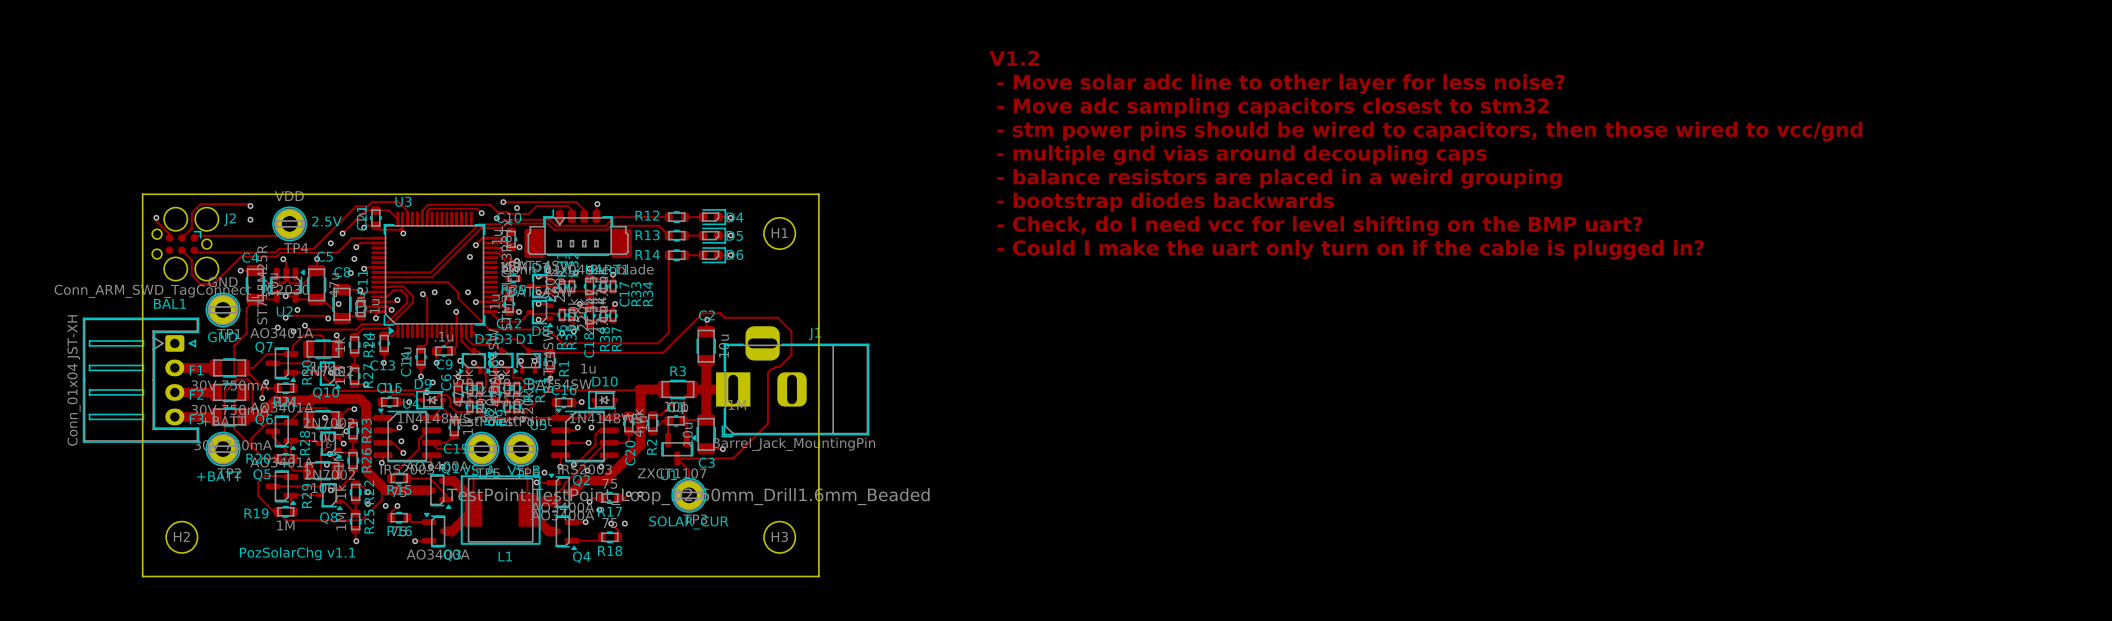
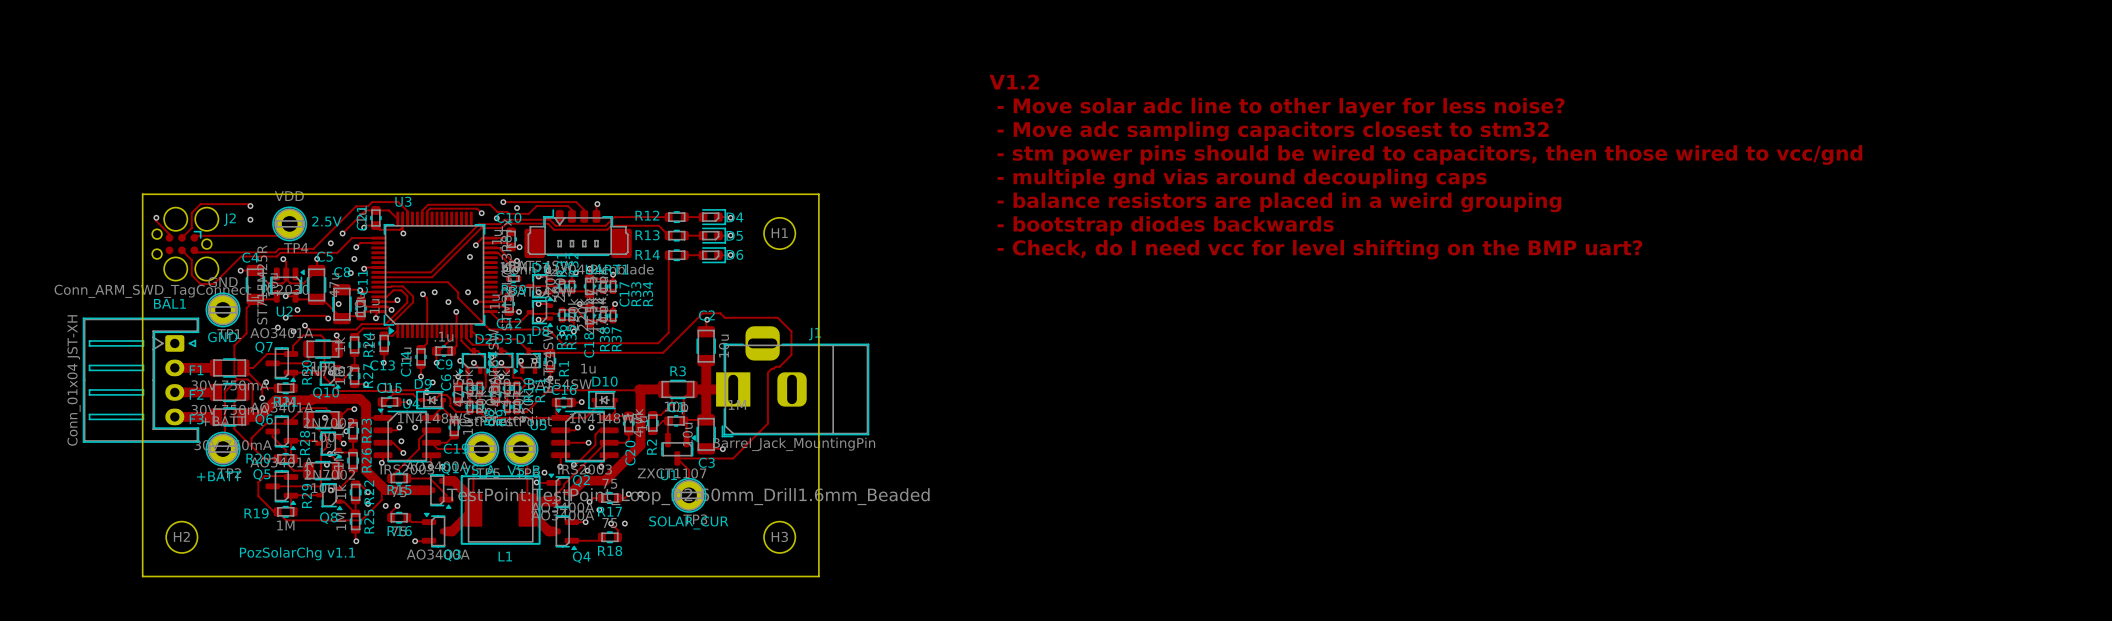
text: V1.2 (1014, 58) -> none
text: - Move solar adc line to other layer for less noise? (1281, 84) -> V1.2 (1014, 82)
text: - Move adc sampling capacitors closest to stm32 (1273, 107) -> - Move solar adc line to other layer for less noise? (1281, 107)
text: - stm power pins should be wired to capacitors, then those wired to vcc/gnd (1429, 131) -> - Move adc sampling capacitors closest to stm32 (1273, 131)
text: - multiple gnd vias around decoupling caps (1242, 155) -> - stm power pins should be wired to capacitors, then those wired to vcc/gnd (1429, 155)
text: - balance resistors are placed in a weird grouping (1279, 178) -> - multiple gnd vias around decoupling caps (1242, 178)
text: - bootstrap diodes backwards (1165, 202) -> - balance resistors are placed in a weird grouping (1279, 202)
text: - Check, do I need vcc for level shifting on the BMP uart? (1319, 226) -> - bootstrap diodes backwards (1165, 225)
text: - Could I make the uart only turn on if the cable is plugged in? (1350, 249) -> - Check, do I need vcc for level shifting on the BMP uart? (1319, 249)

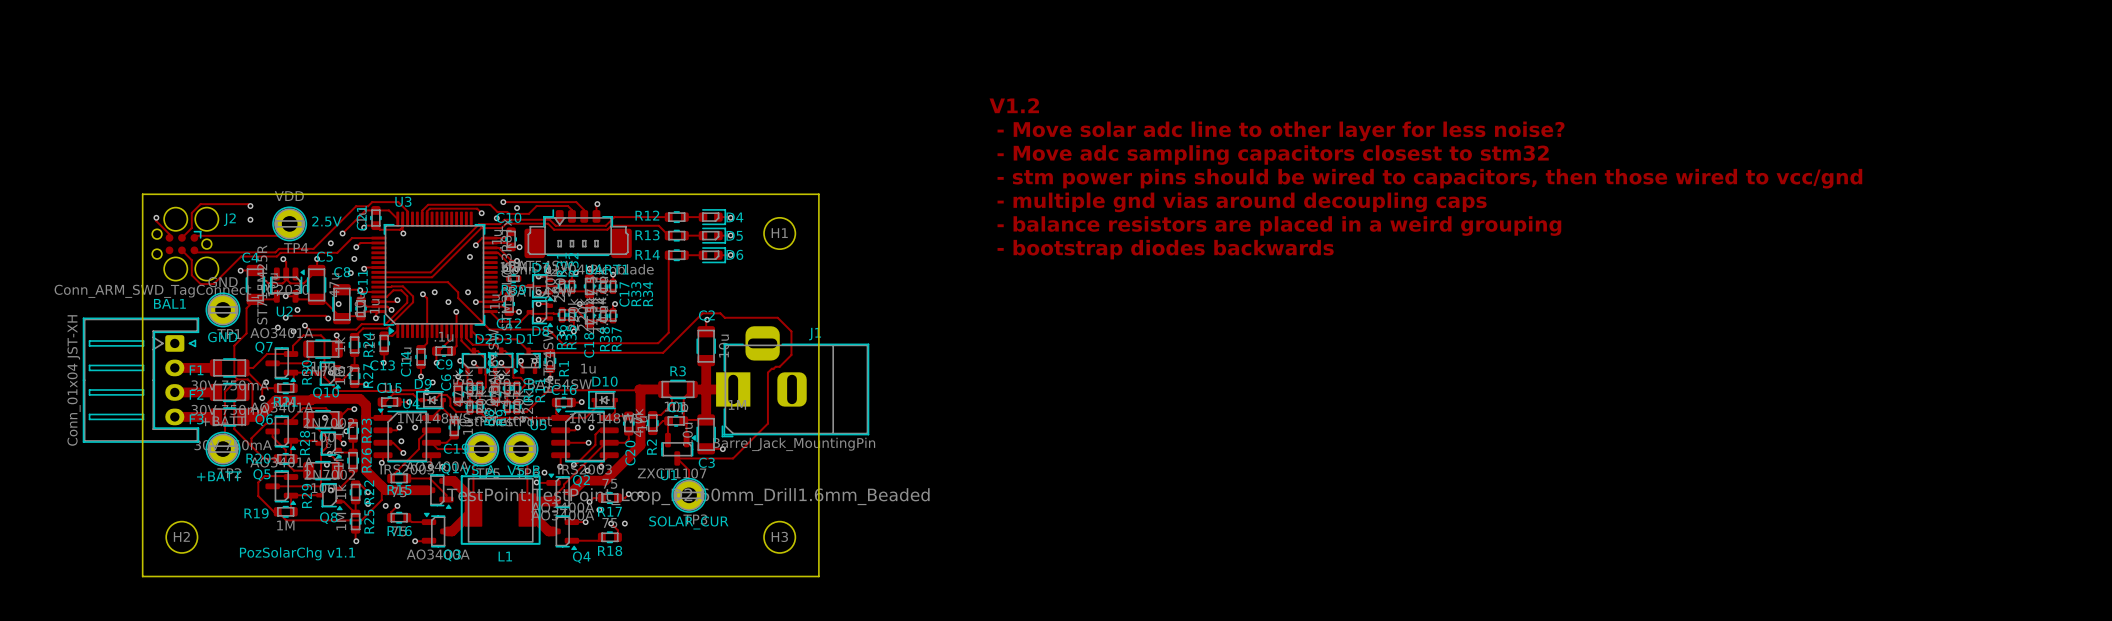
text: V1.2 (1014, 82) -> none
text: - Move solar adc line to other layer for less noise? (1281, 107) -> V1.2 (1014, 105)
text: - Move adc sampling capacitors closest to stm32 (1273, 131) -> - Move solar adc line to other layer for less noise? (1281, 131)
text: - stm power pins should be wired to capacitors, then those wired to vcc/gnd (1429, 155) -> - Move adc sampling capacitors closest to stm32 (1273, 155)
text: - multiple gnd vias around decoupling caps (1242, 178) -> - stm power pins should be wired to capacitors, then those wired to vcc/gnd (1429, 178)
text: - balance resistors are placed in a weird grouping (1279, 202) -> - multiple gnd vias around decoupling caps (1242, 202)
text: - bootstrap diodes backwards (1165, 225) -> - balance resistors are placed in a weird grouping (1279, 226)
text: - Check, do I need vcc for level shifting on the BMP uart? (1319, 249) -> - bootstrap diodes backwards (1165, 249)

